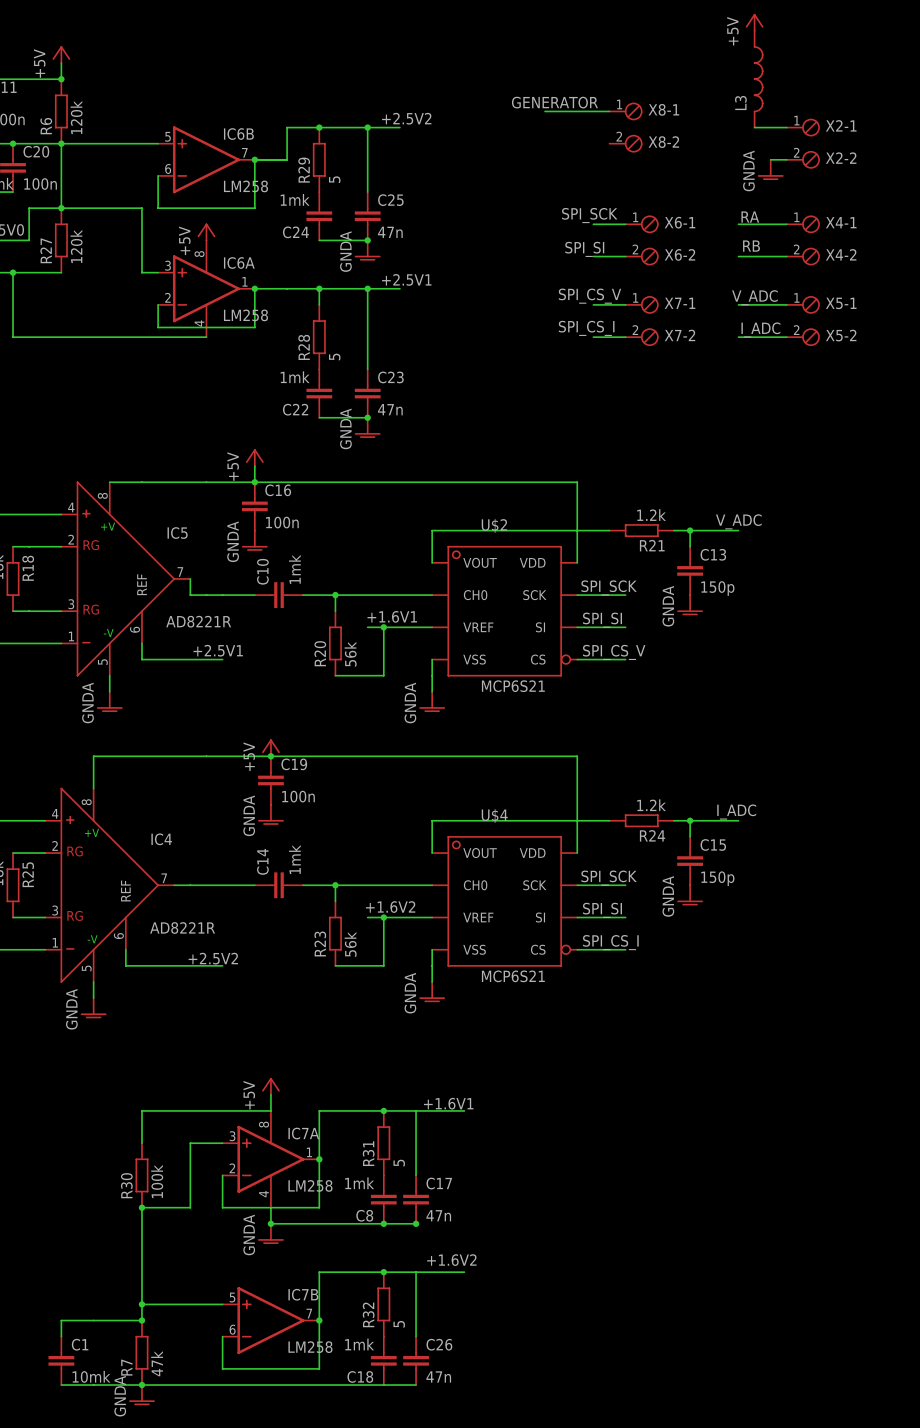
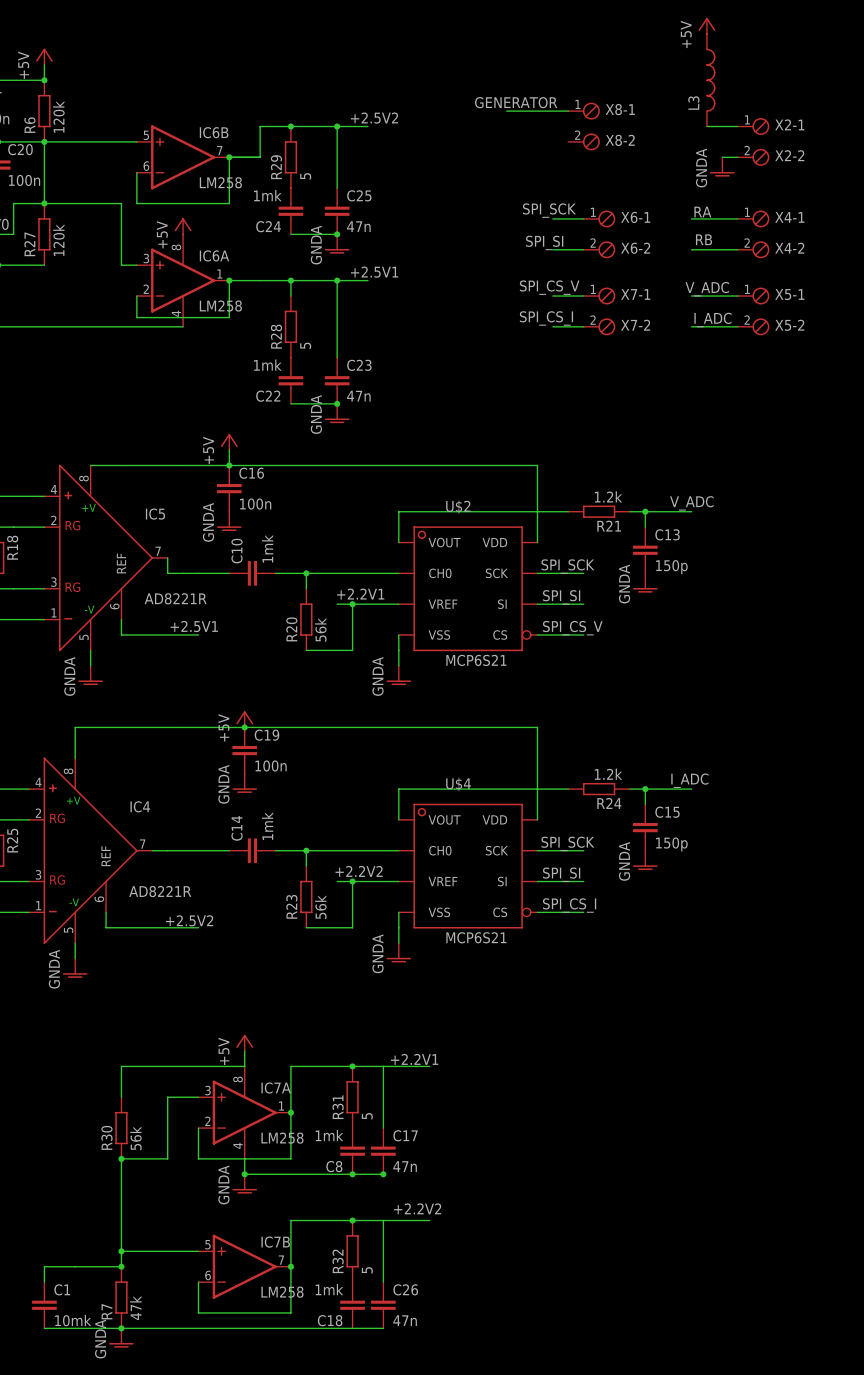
label: +1.6V1 (392, 616) -> +2.2V1 (360, 594)
label: +1.6V2 (390, 907) -> +2.2V2 (359, 871)
label: +1.6V1 (448, 1103) -> +2.2V1 (414, 1059)
R30 value: 100k (157, 1181) -> 56k (135, 1138)
label: +1.6V2 (451, 1260) -> +2.2V2 (417, 1208)

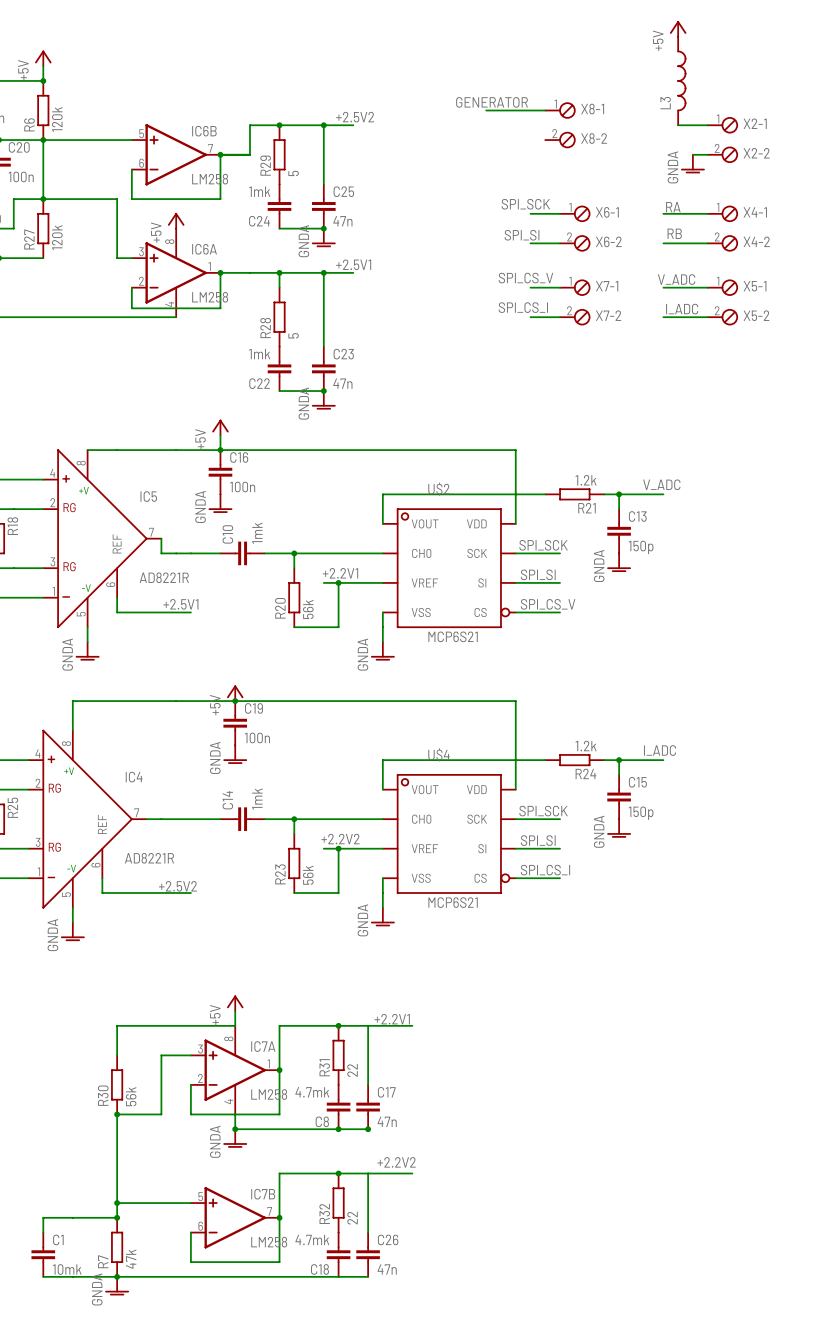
R31 value: 5 (367, 1116) -> 22 (352, 1070)
C8 value: 1mk (329, 1135) -> 4.7mk (312, 1092)
R32 value: 5 (367, 1270) -> 22 (352, 1218)
C18 value: 1mk (329, 1289) -> 4.7mk (312, 1239)

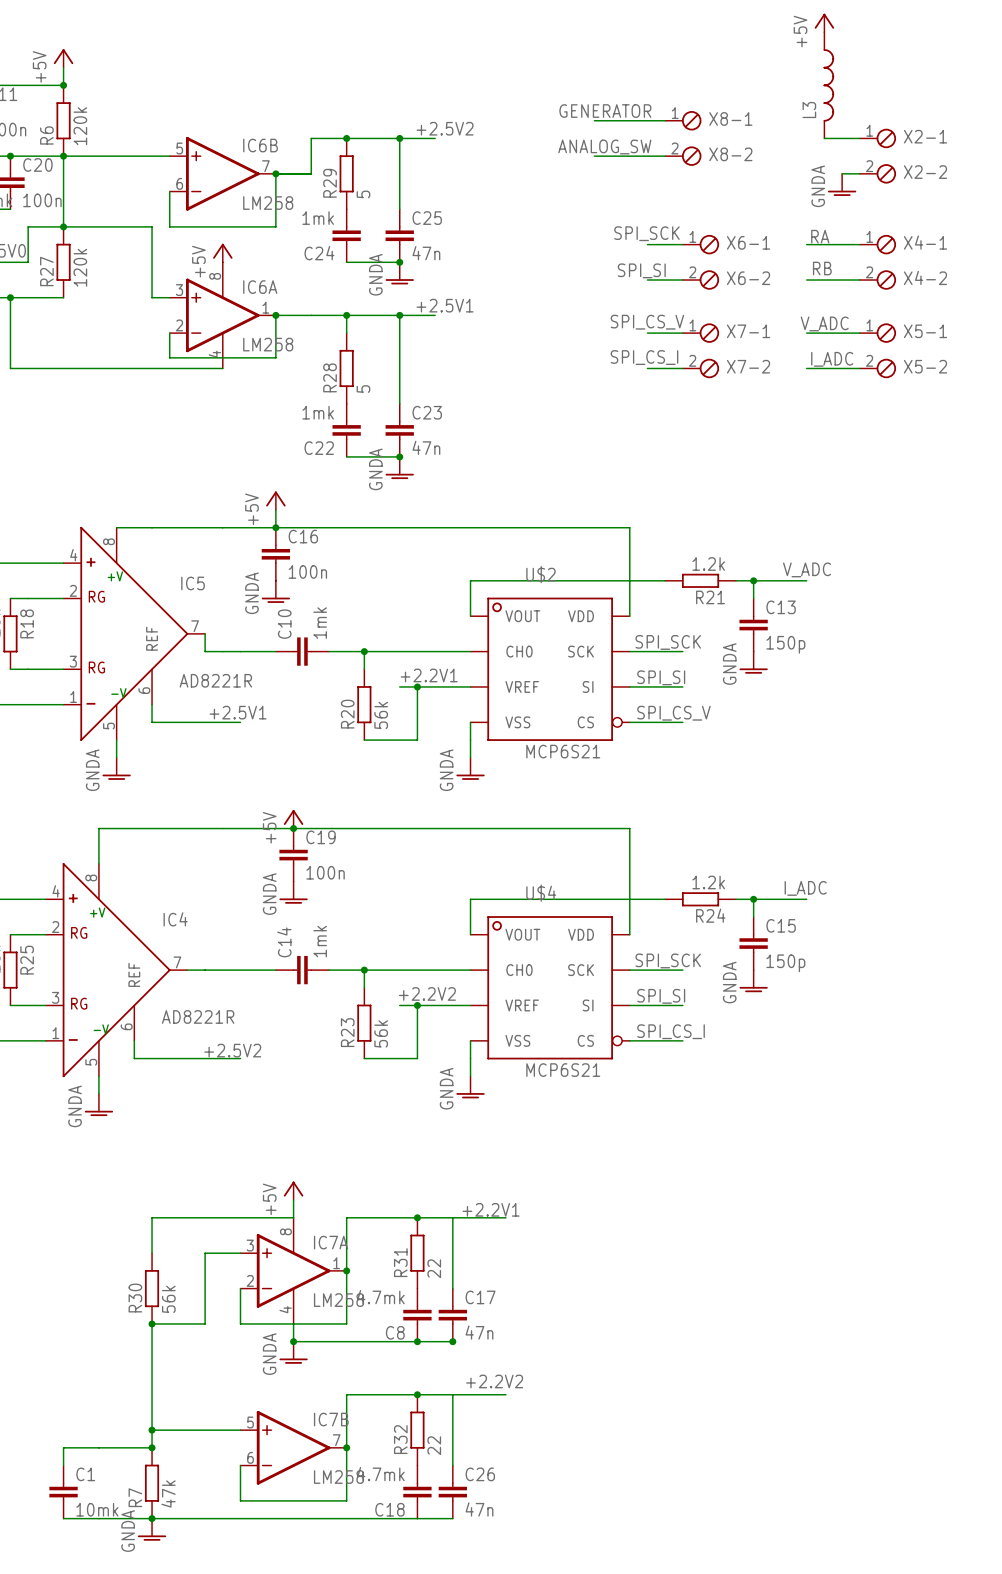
label: none -> ANALOG_SW (604, 147)
wire: none -> (594, 156) (665, 156)

